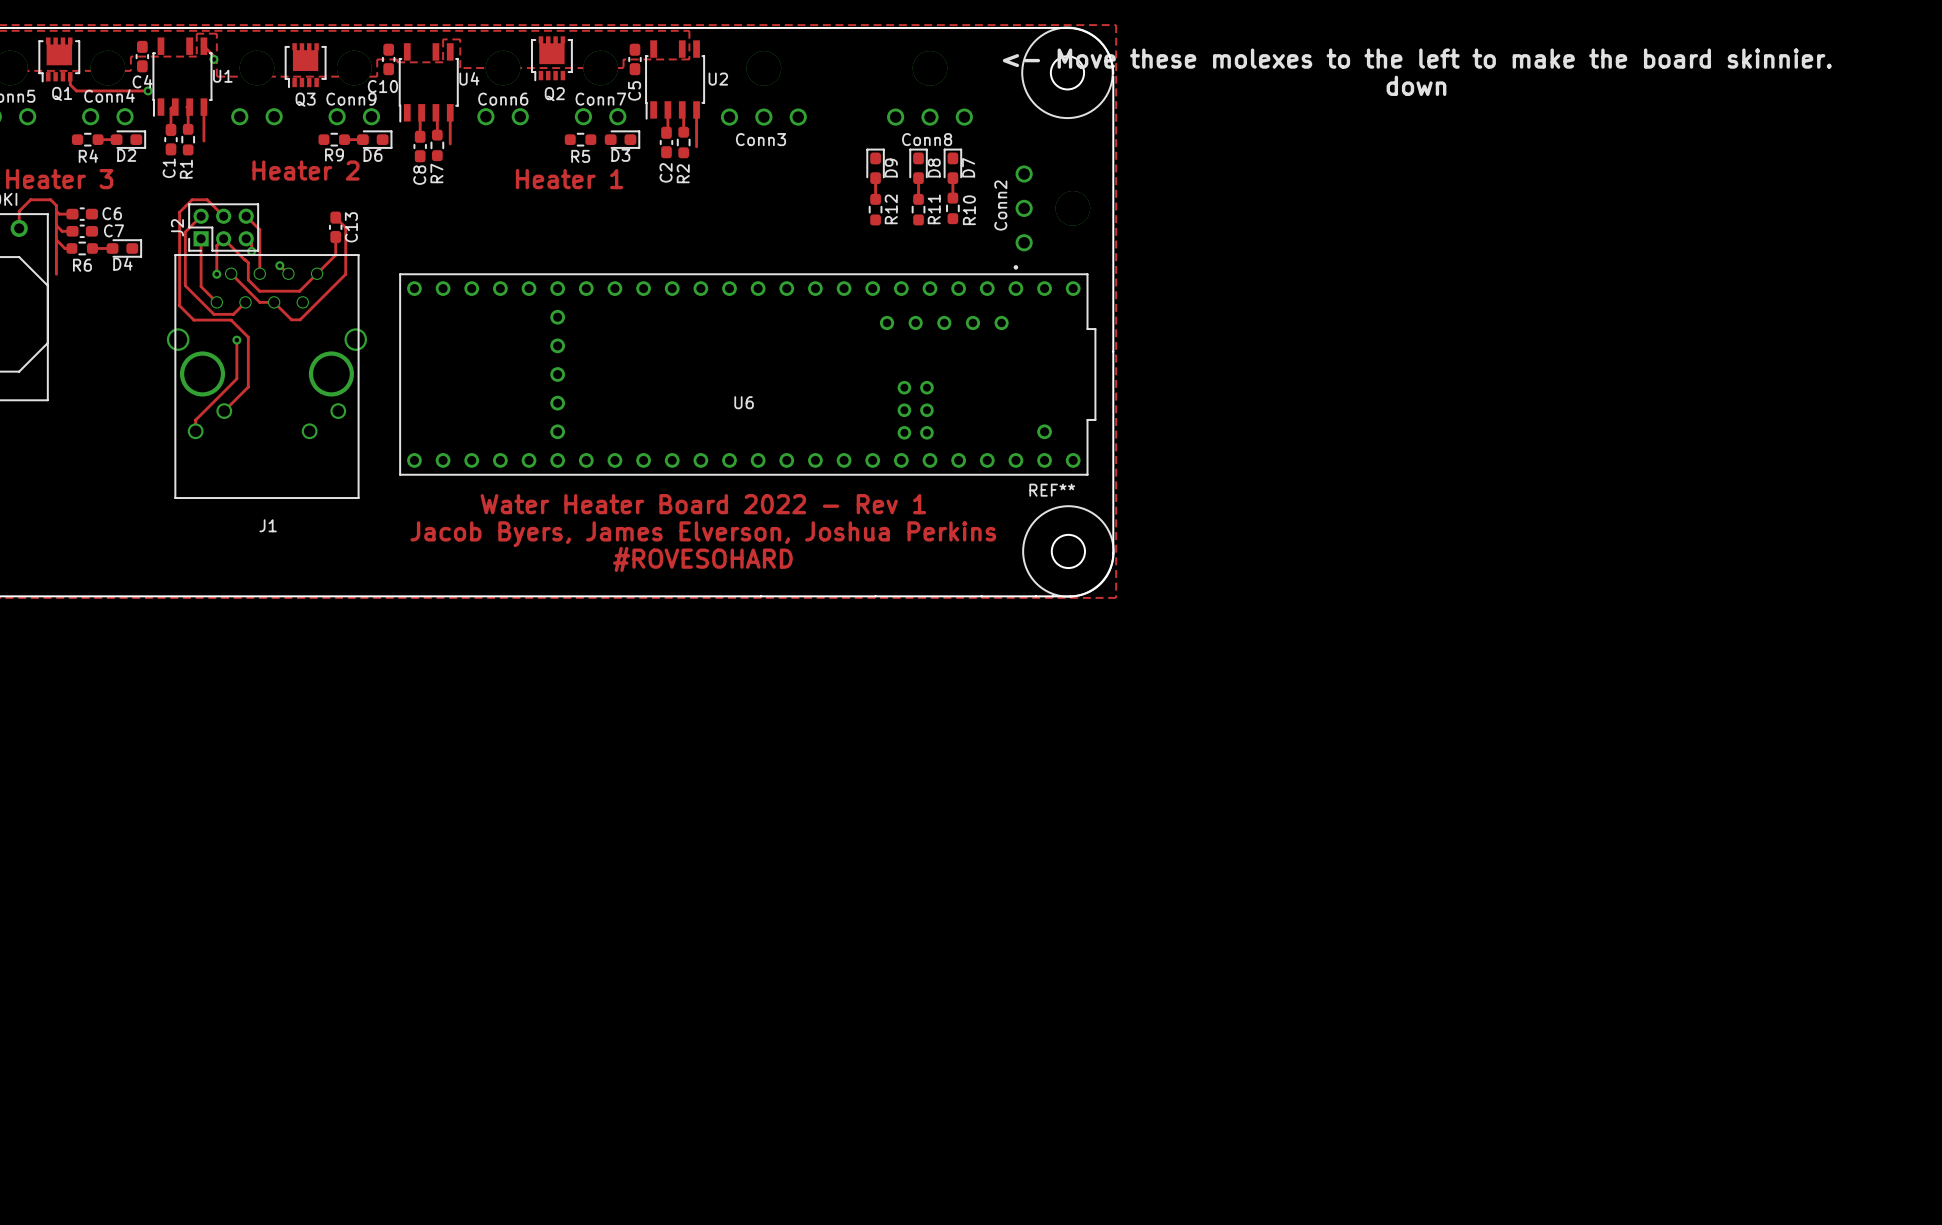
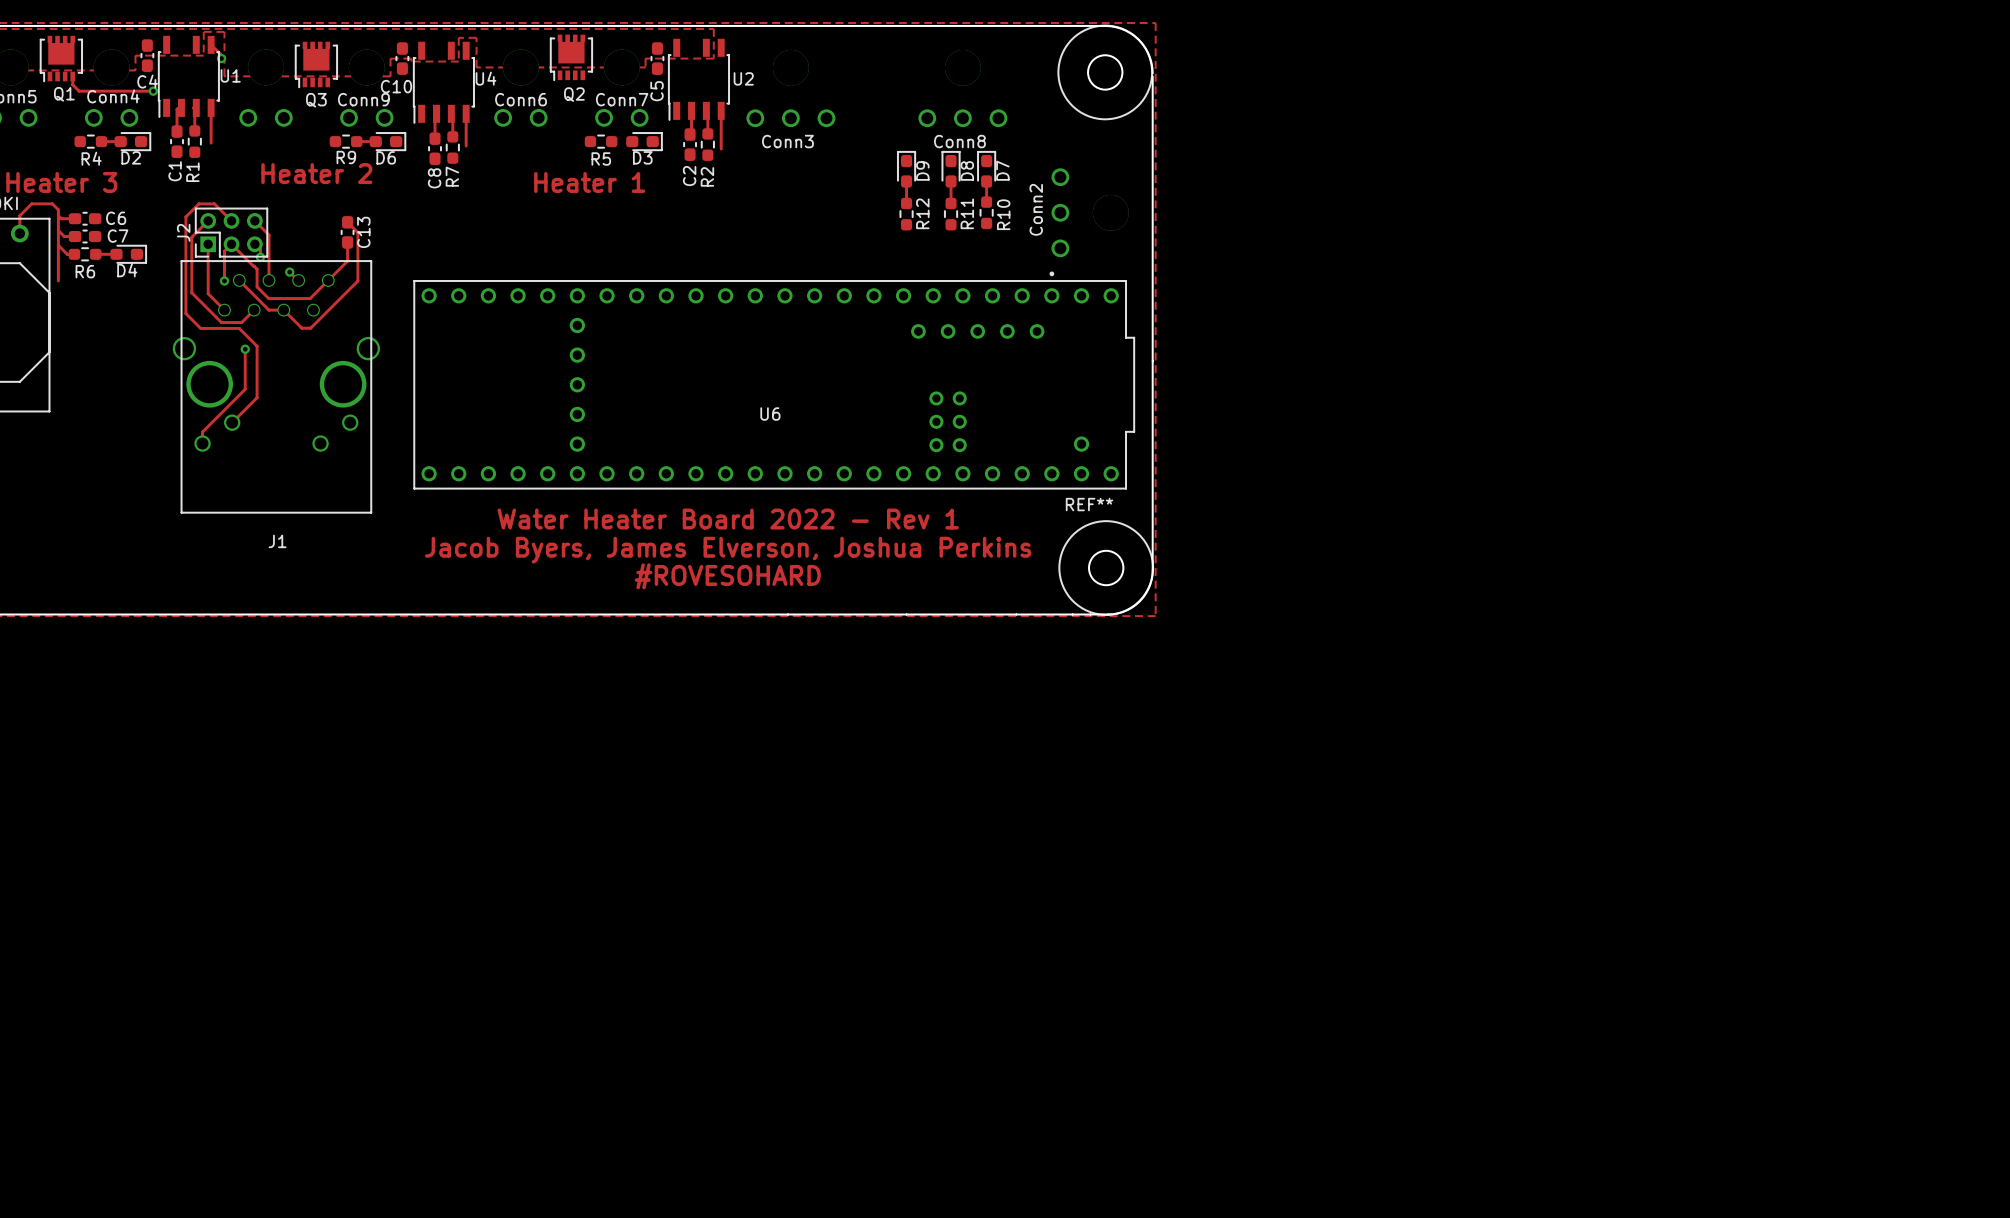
text: <- Move these molexes to the left to make the board skinnier. (1417, 58) -> none
text: down (1416, 85) -> none

